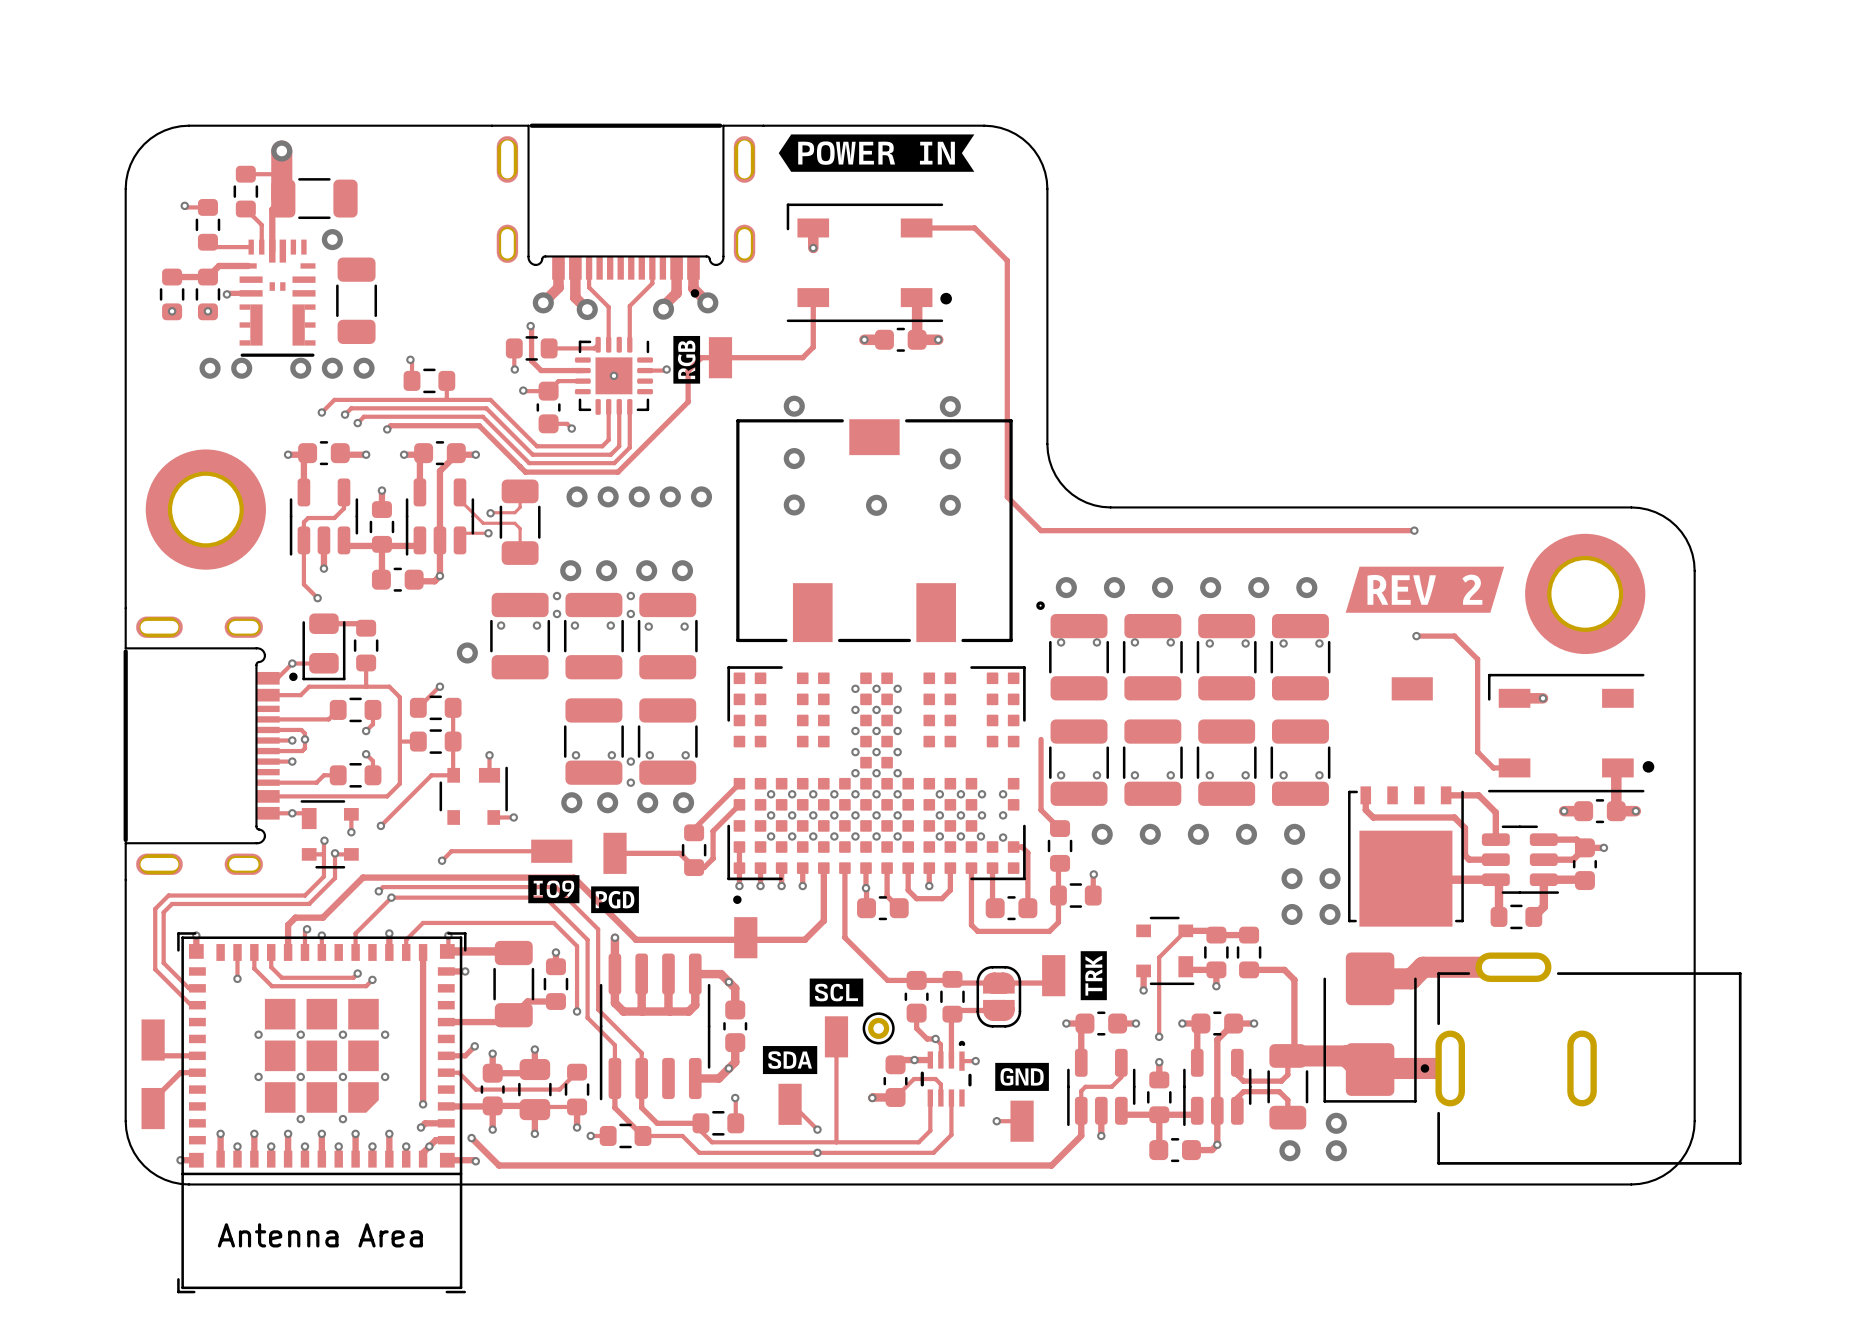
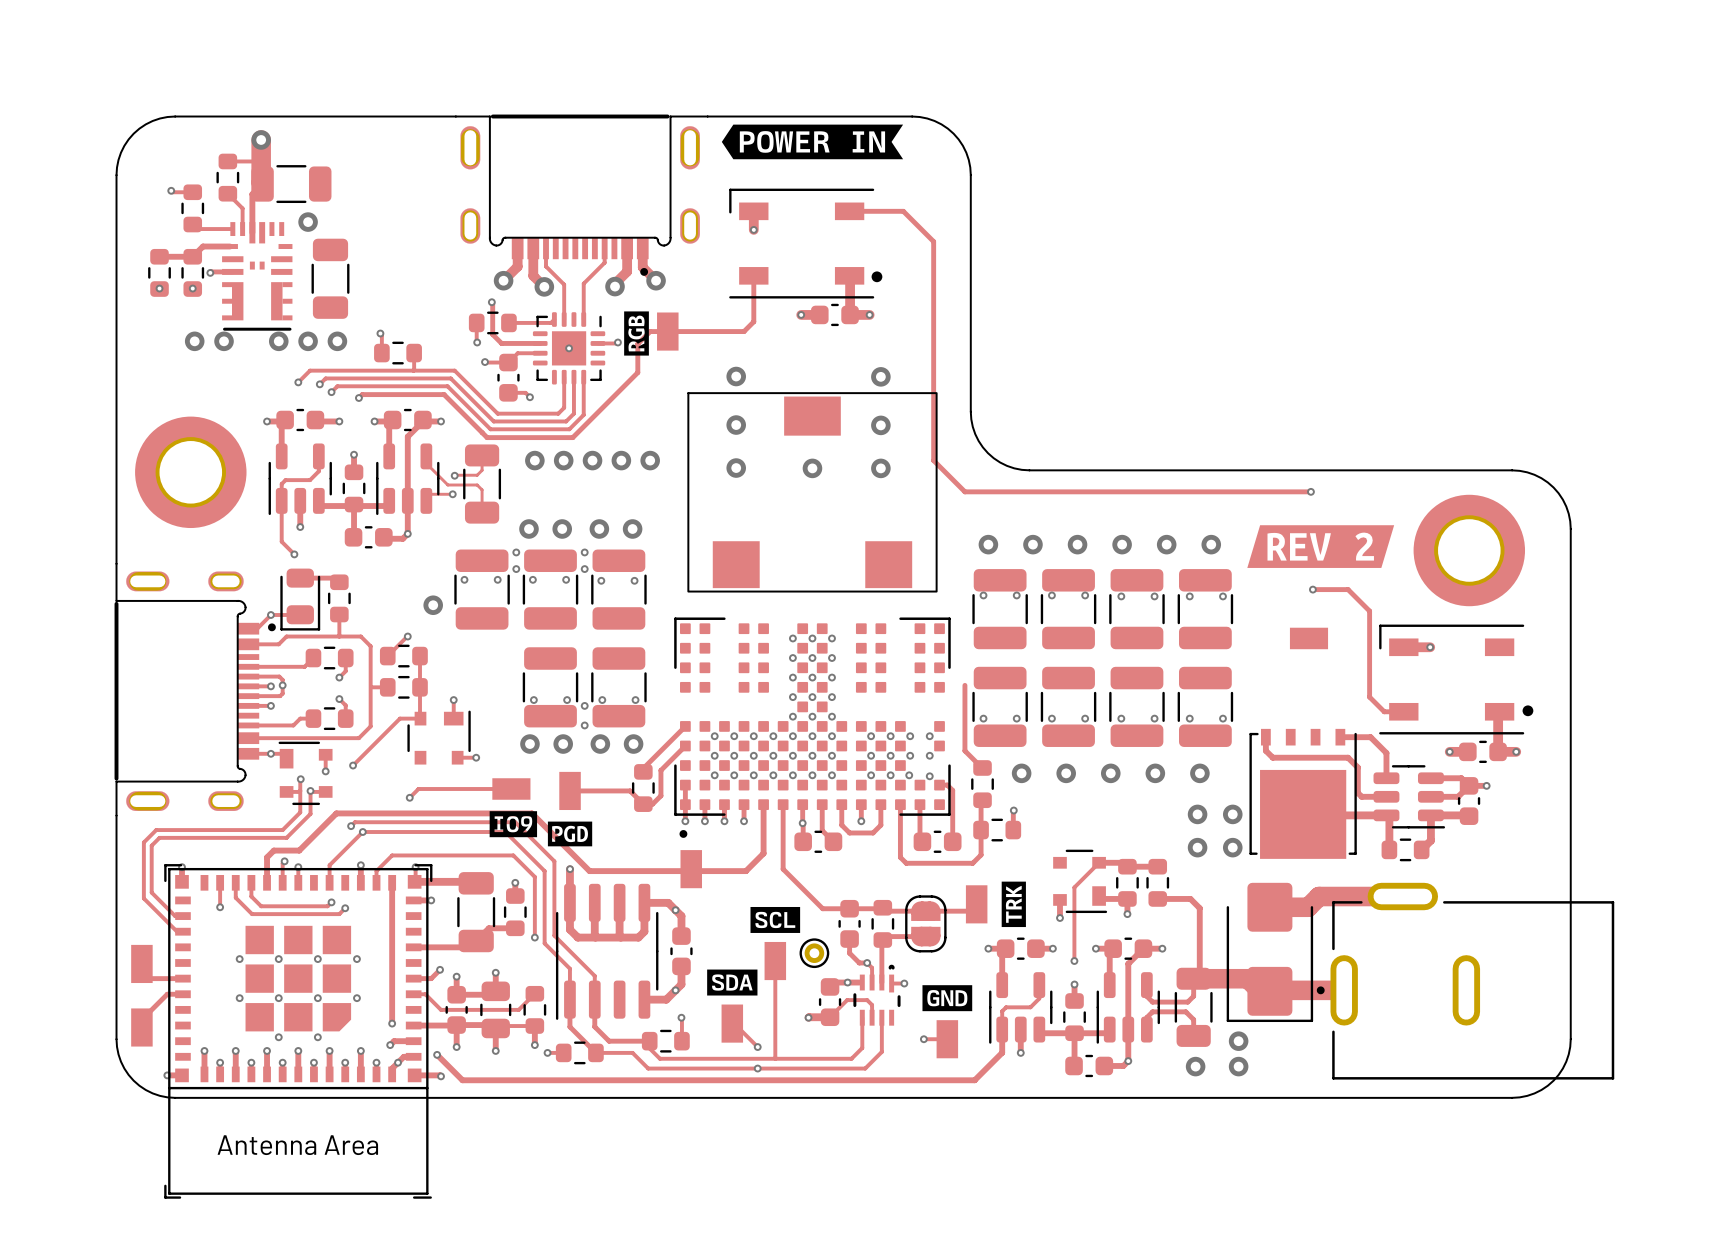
part footprint: [736, 419, 1045, 643] -> [687, 392, 938, 593]

